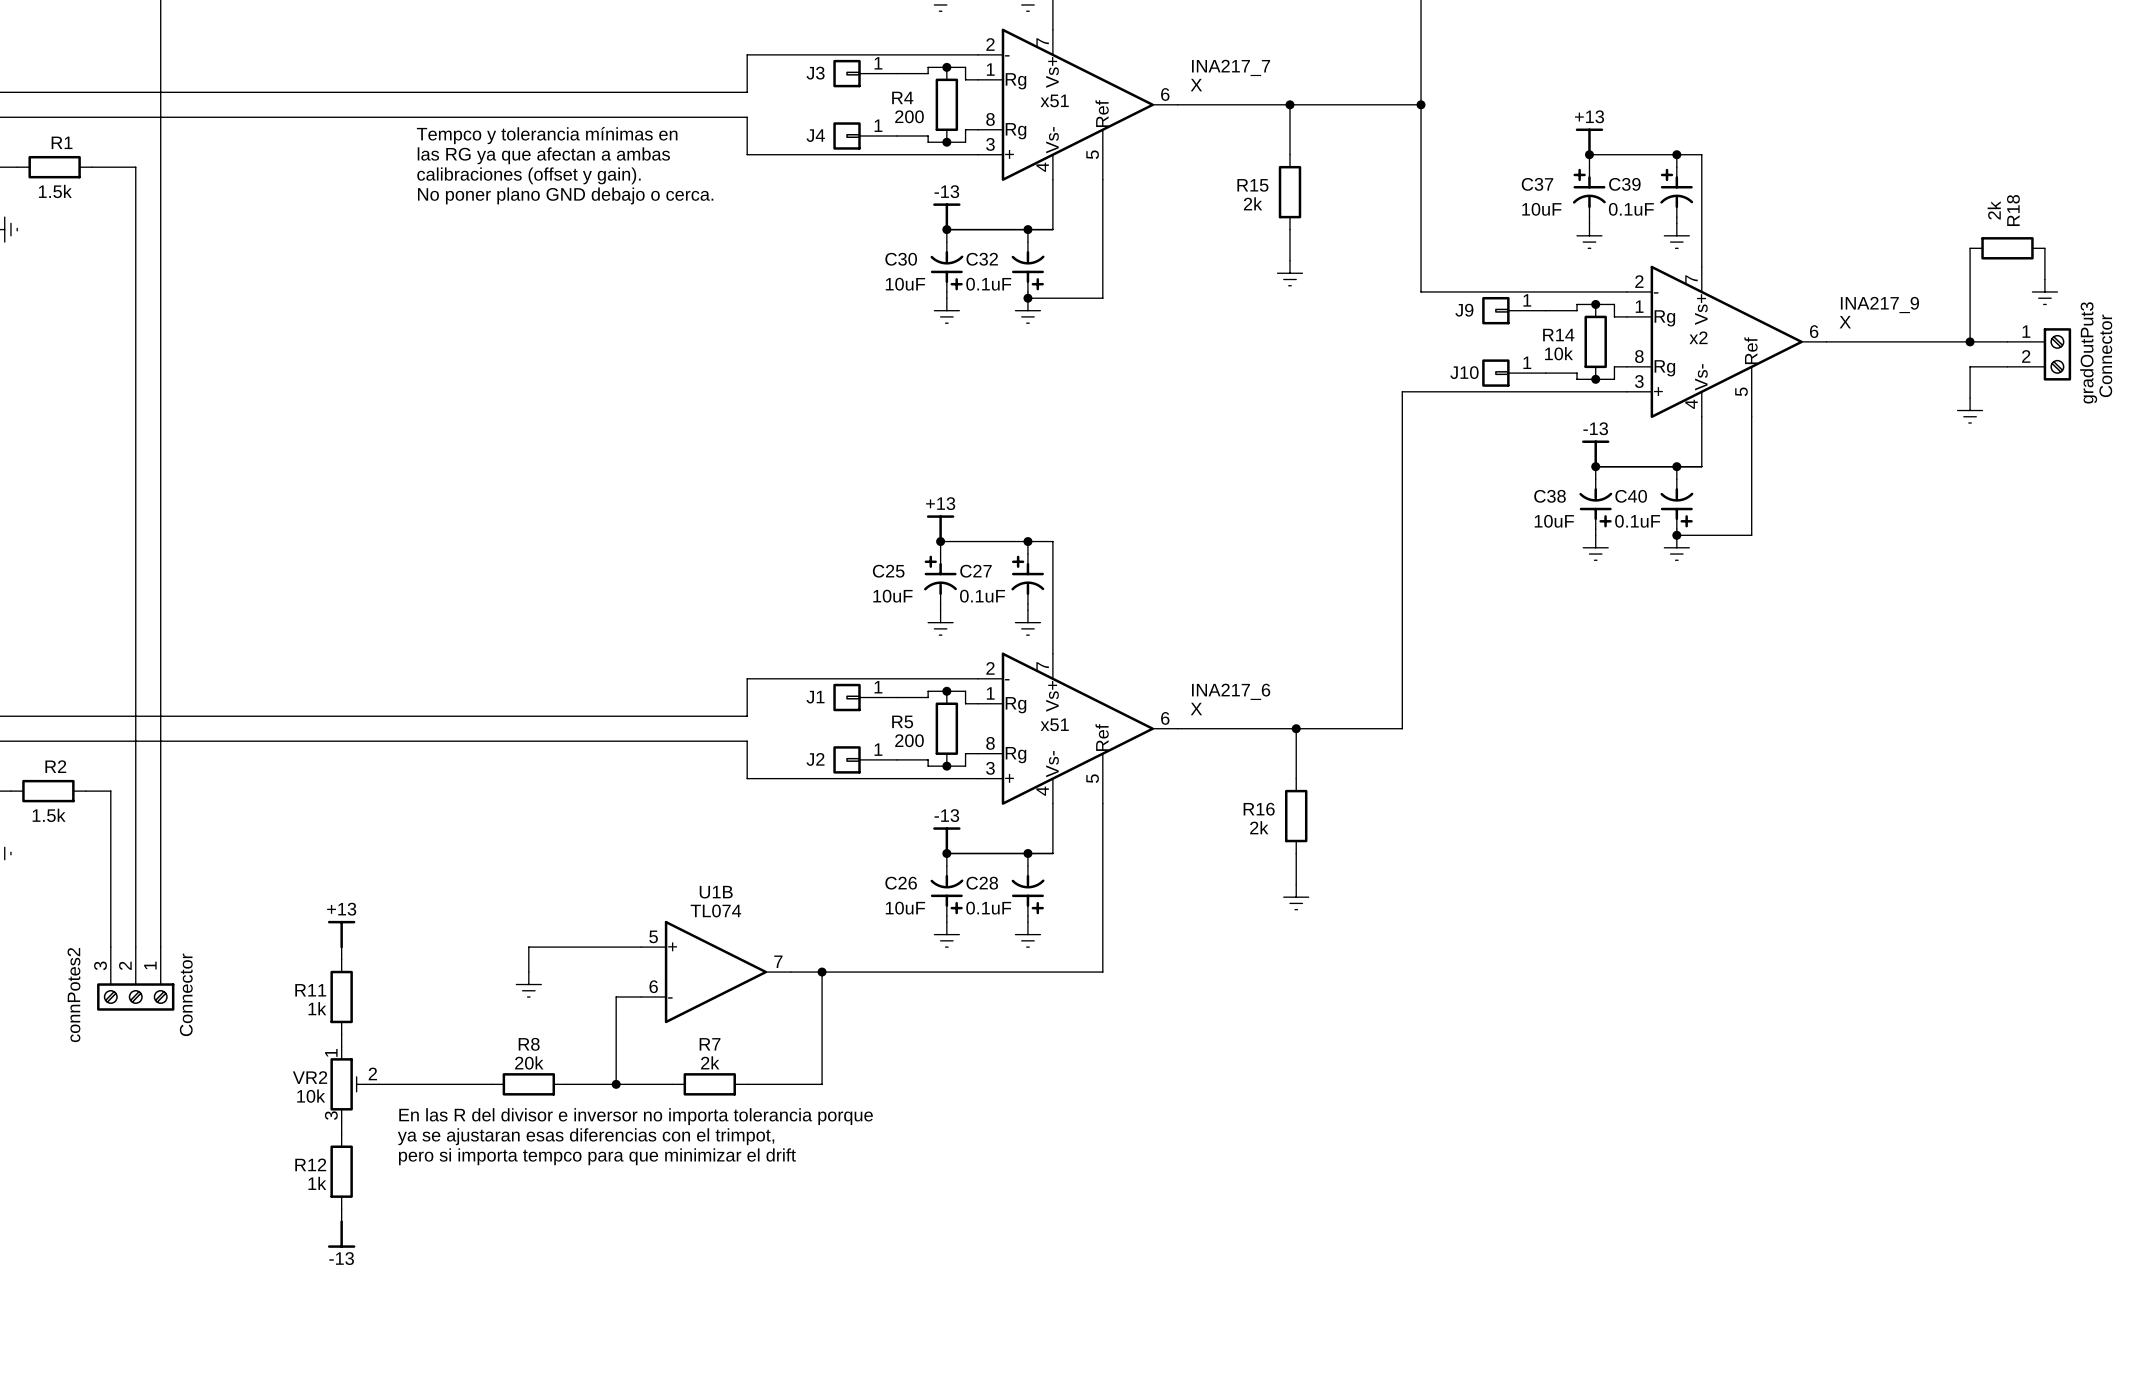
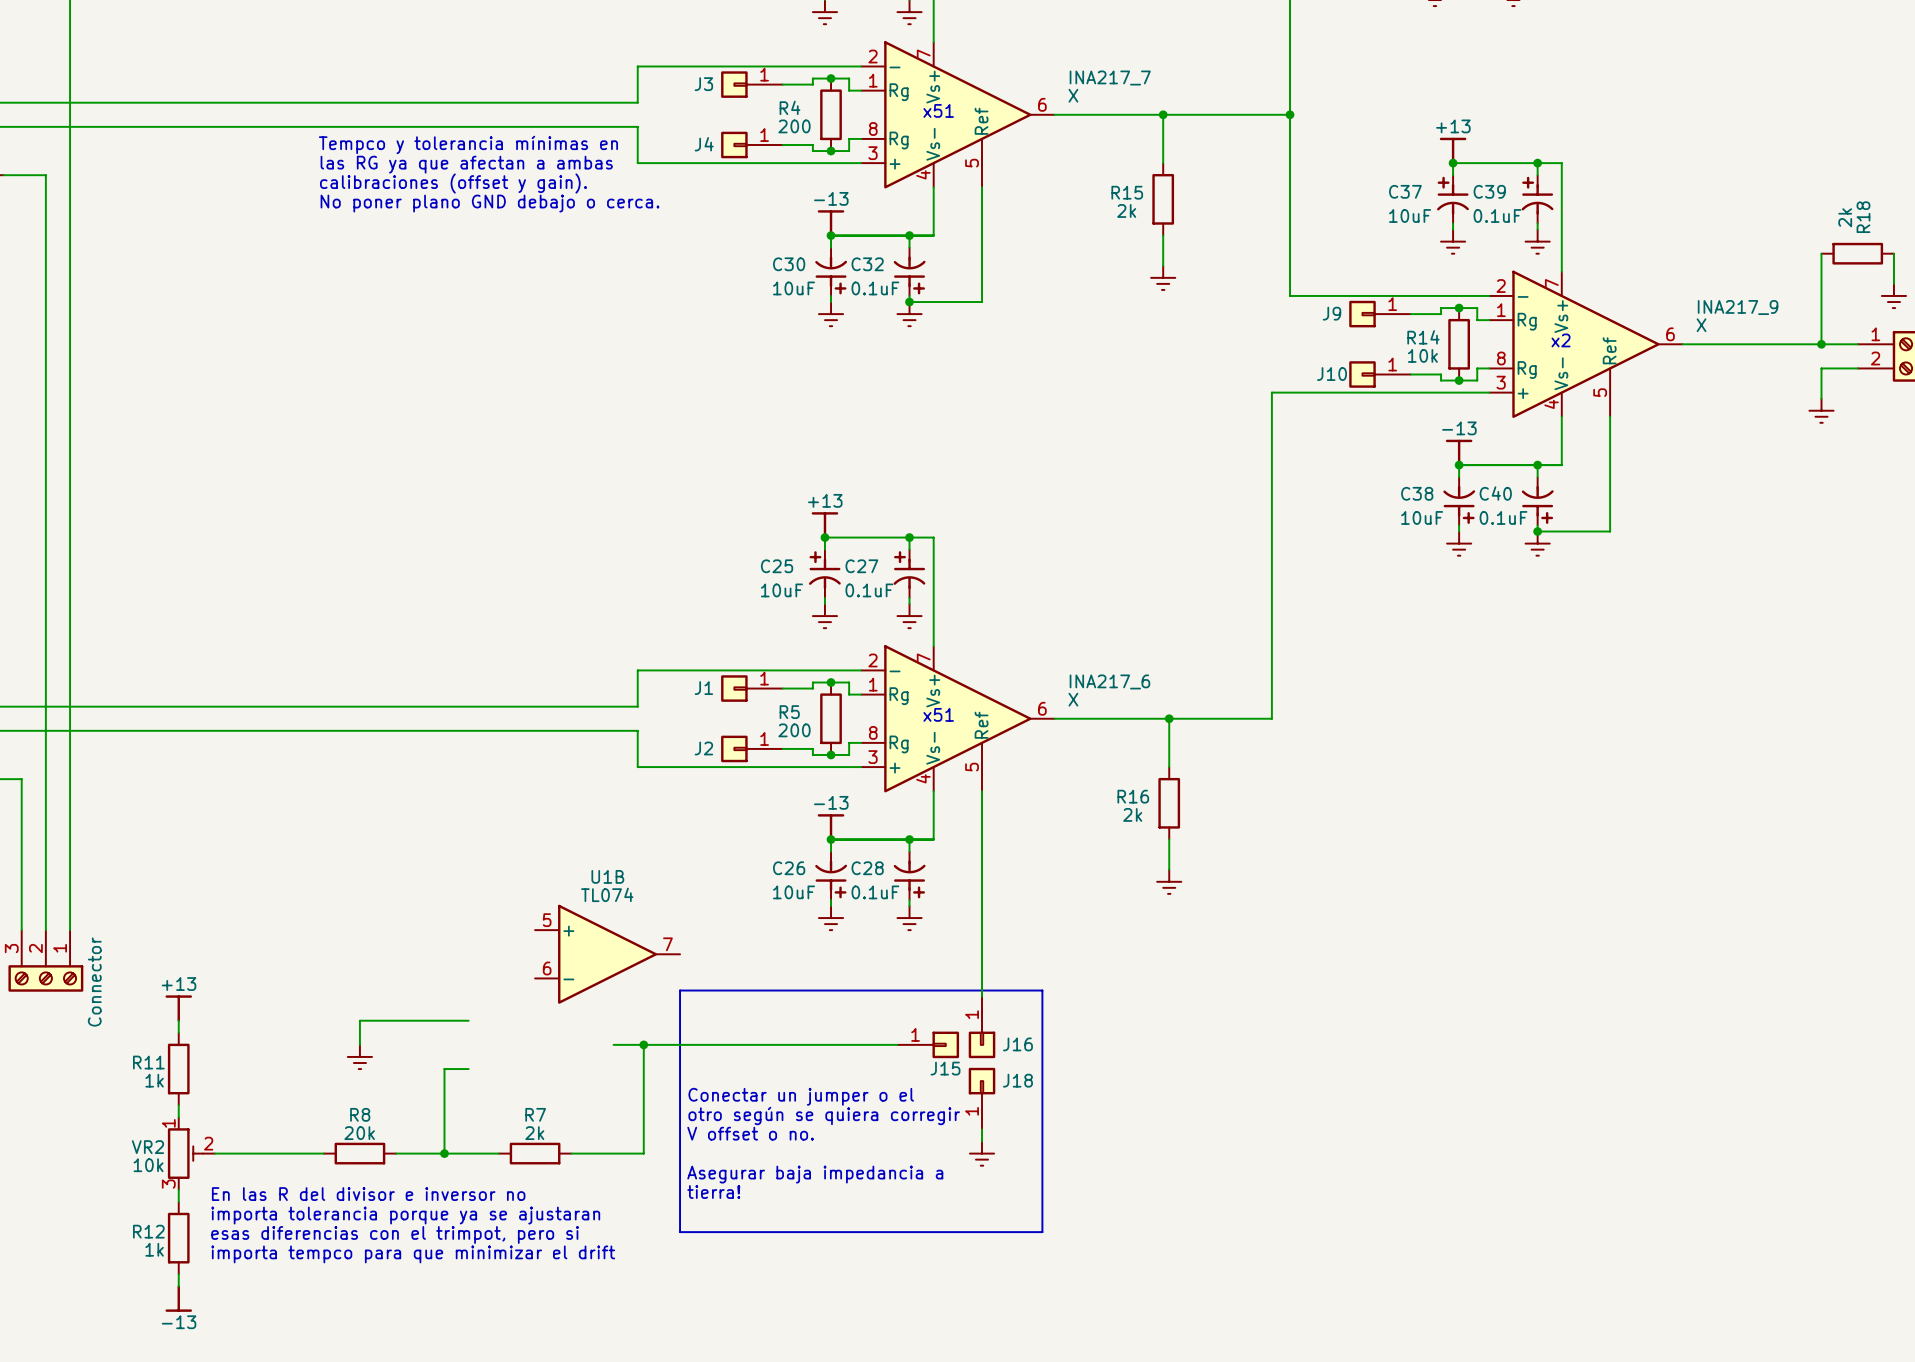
power symbol position: +13 (341, 934) -> +13 (178, 1008)
wire: (341, 947) (341, 959) -> (178, 1020) (178, 1032)
wire: (641, 947) (528, 947) (528, 972) -> (468, 1020) (359, 1020) (359, 1044)
wire: (790, 972) (1102, 972) -> (982, 996) (982, 954)
wire: (822, 972) (822, 1084) (747, 1084) -> (643, 1044) (643, 1153) (571, 1153)
junction: (822, 972) -> none
power symbol position: (528, 984) -> (359, 1056)
R11 position: (341, 997) -> (178, 1069)
wire: (641, 997) (616, 997) (616, 1084) -> (468, 1069) (444, 1069) (444, 1153)
line: none -> (680, 990) (1042, 990) (1042, 1232) (680, 1232) (680, 990)
wire: (341, 1034) (341, 1046) -> (178, 1105) (178, 1117)
J16: none -> (982, 1027)
wire: none -> (613, 1044) (897, 1044)
junction: none -> (643, 1044)
J15: none -> (928, 1044)
VR2 position: (354, 1084) -> (191, 1153)
wire: (379, 1084) (491, 1084) -> (214, 1153) (323, 1153)
R8 position: (528, 1084) -> (359, 1153)
wire: (566, 1084) (672, 1084) -> (396, 1153) (498, 1153)
junction: (616, 1084) -> none
R7 position: (709, 1084) -> (535, 1153)
text: En las R del divisor e inversor no importa tolerancia porque (636, 1116) -> none
text: none -> Conectar un jumper o el (801, 1096)
wire: (341, 1121) (341, 1134) -> (178, 1189) (178, 1201)
J18: none -> (982, 1098)
text: ya se ajustaran esas diferencias con el trimpot, (586, 1136) -> none
text: none -> otro según se quiera corregir (824, 1115)
wire: none -> (982, 1129) (982, 1141)
text: pero si importa tempco para que minimizar el drift (597, 1156) -> none
text: none -> V offset o no. (750, 1133)
R12 position: (341, 1171) -> (178, 1238)
junction: none -> (444, 1153)
power symbol: none -> (982, 1153)
text: none -> Asegurar baja impedancia a (815, 1174)
wire: (341, 1209) (341, 1221) -> (178, 1274) (178, 1286)
text: none -> tierra! (713, 1192)
text: none -> En las R del divisor e inversor no (368, 1194)
power symbol position: -13 (341, 1234) -> -13 (178, 1298)
text: none -> importa tolerancia porque ya se ajustaran (405, 1215)
text: none -> esas diferencias con el trimpot, pero si (395, 1234)
text: none -> importa tempco para que minimizar el drift (413, 1254)

